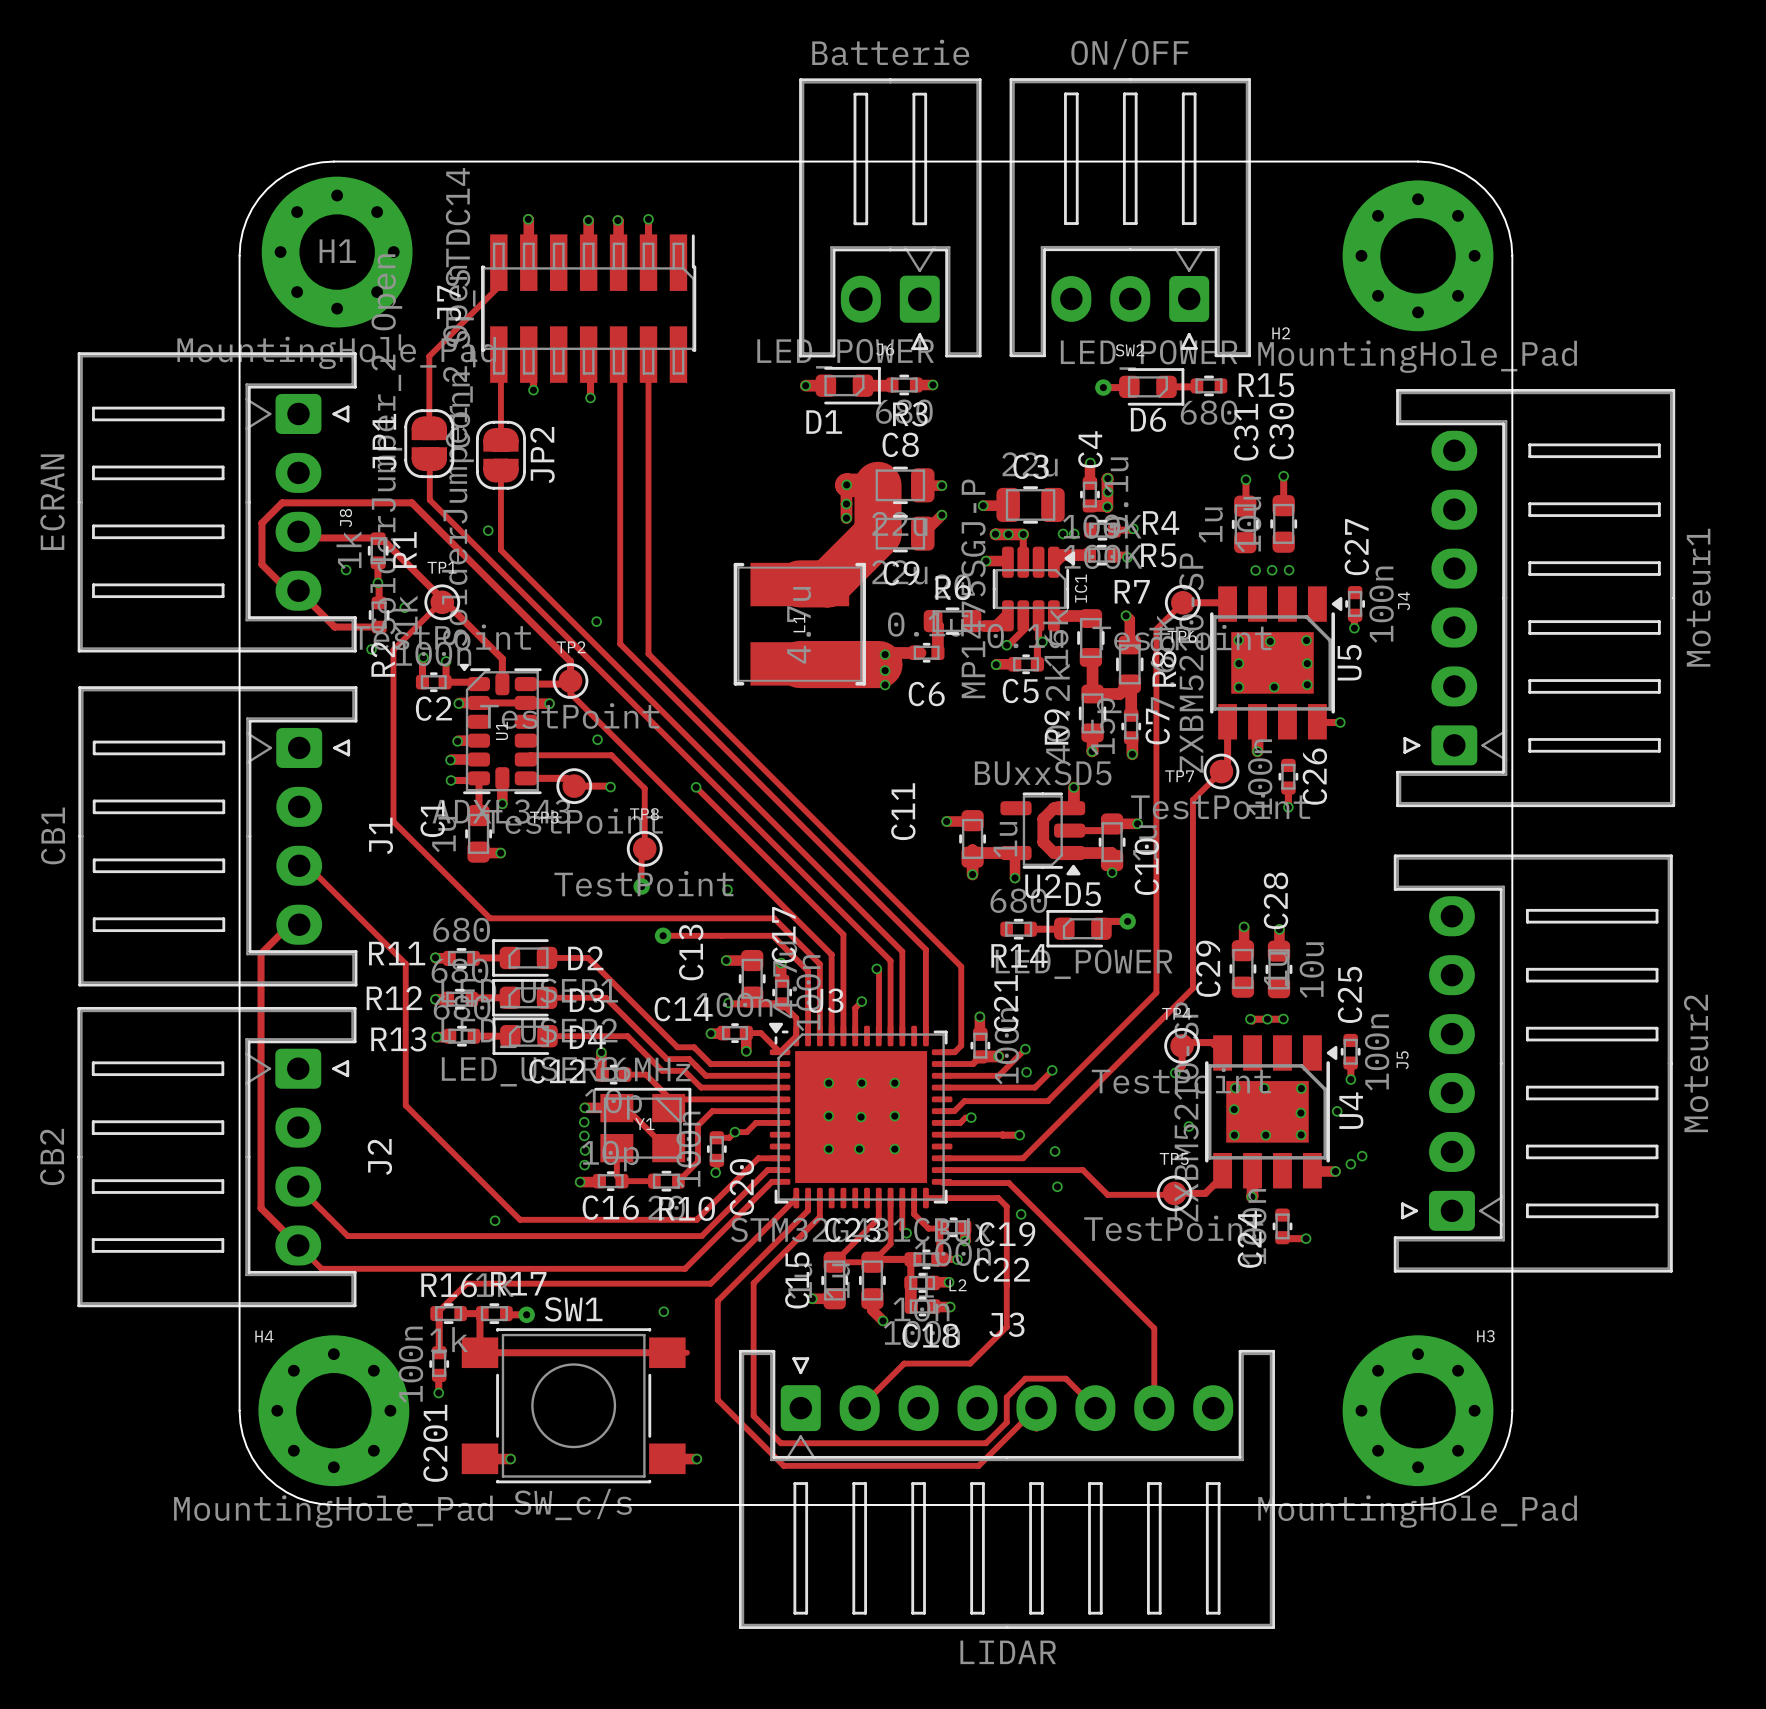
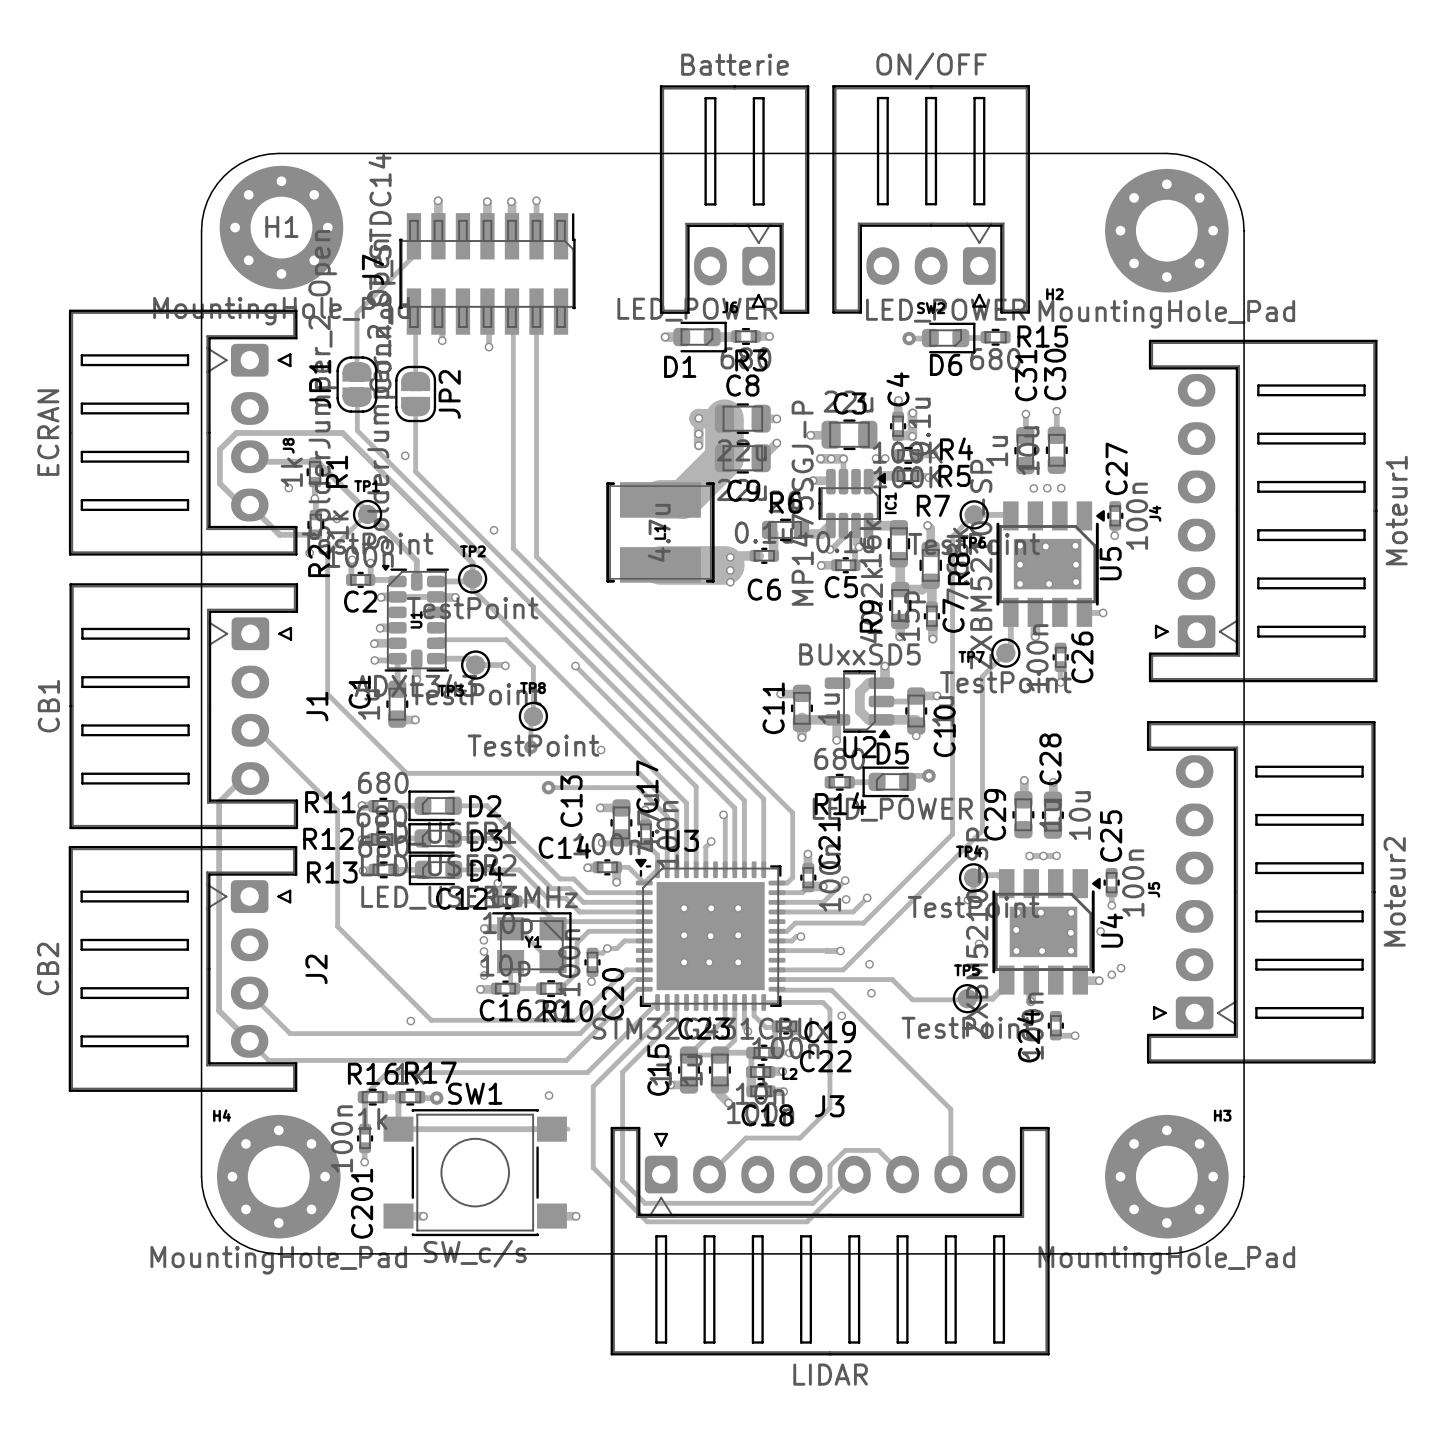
via: (597, 739) -> none
C11 name position: C11 (903, 811) -> C11 (773, 708)

